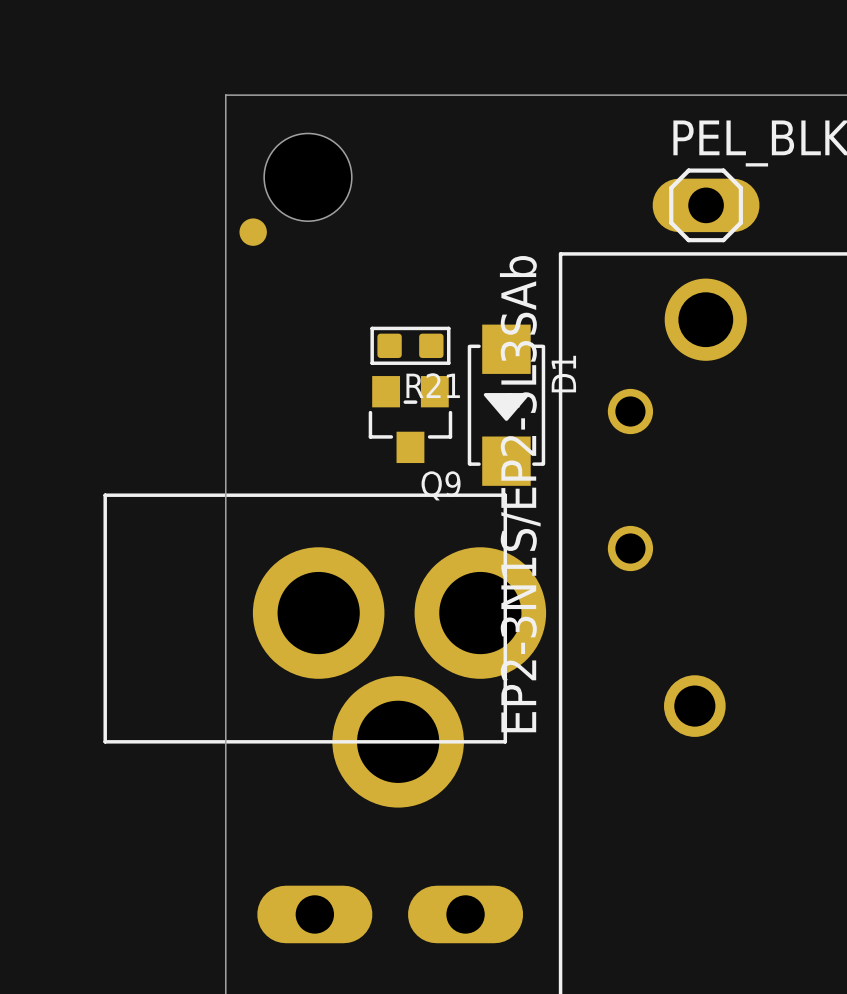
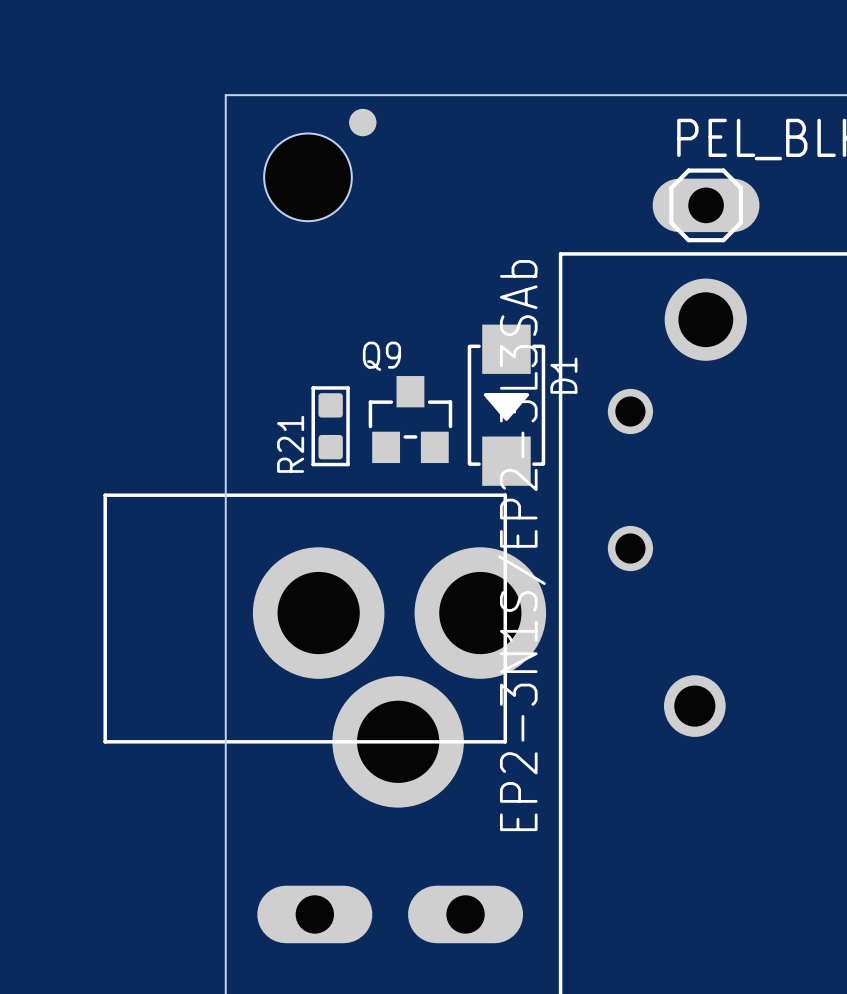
part position: (253, 232) -> (362, 122)
R21 rotation: 0° (410, 345) -> 90° clockwise (330, 426)
R21 position: (410, 345) -> (330, 426)
Q9 rotation: 0° (410, 419) -> 180° (410, 419)

